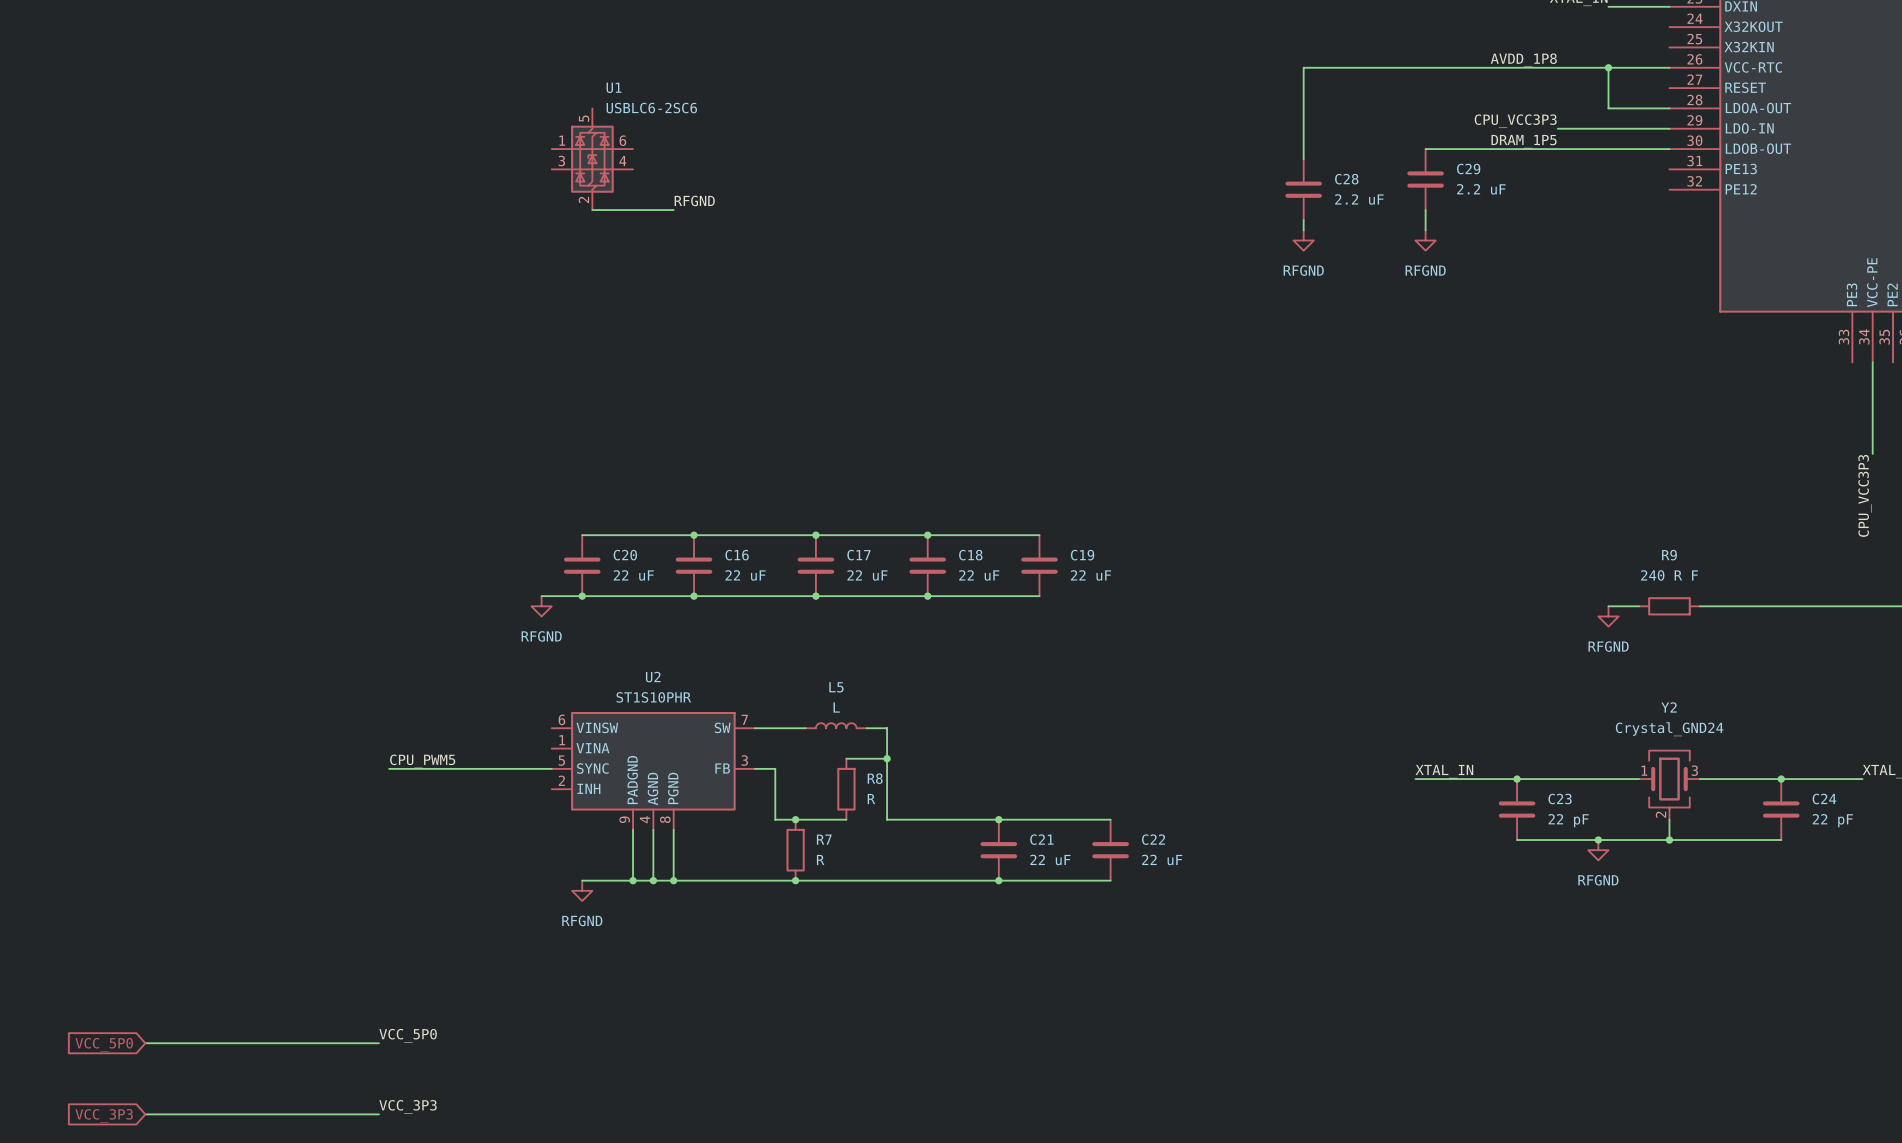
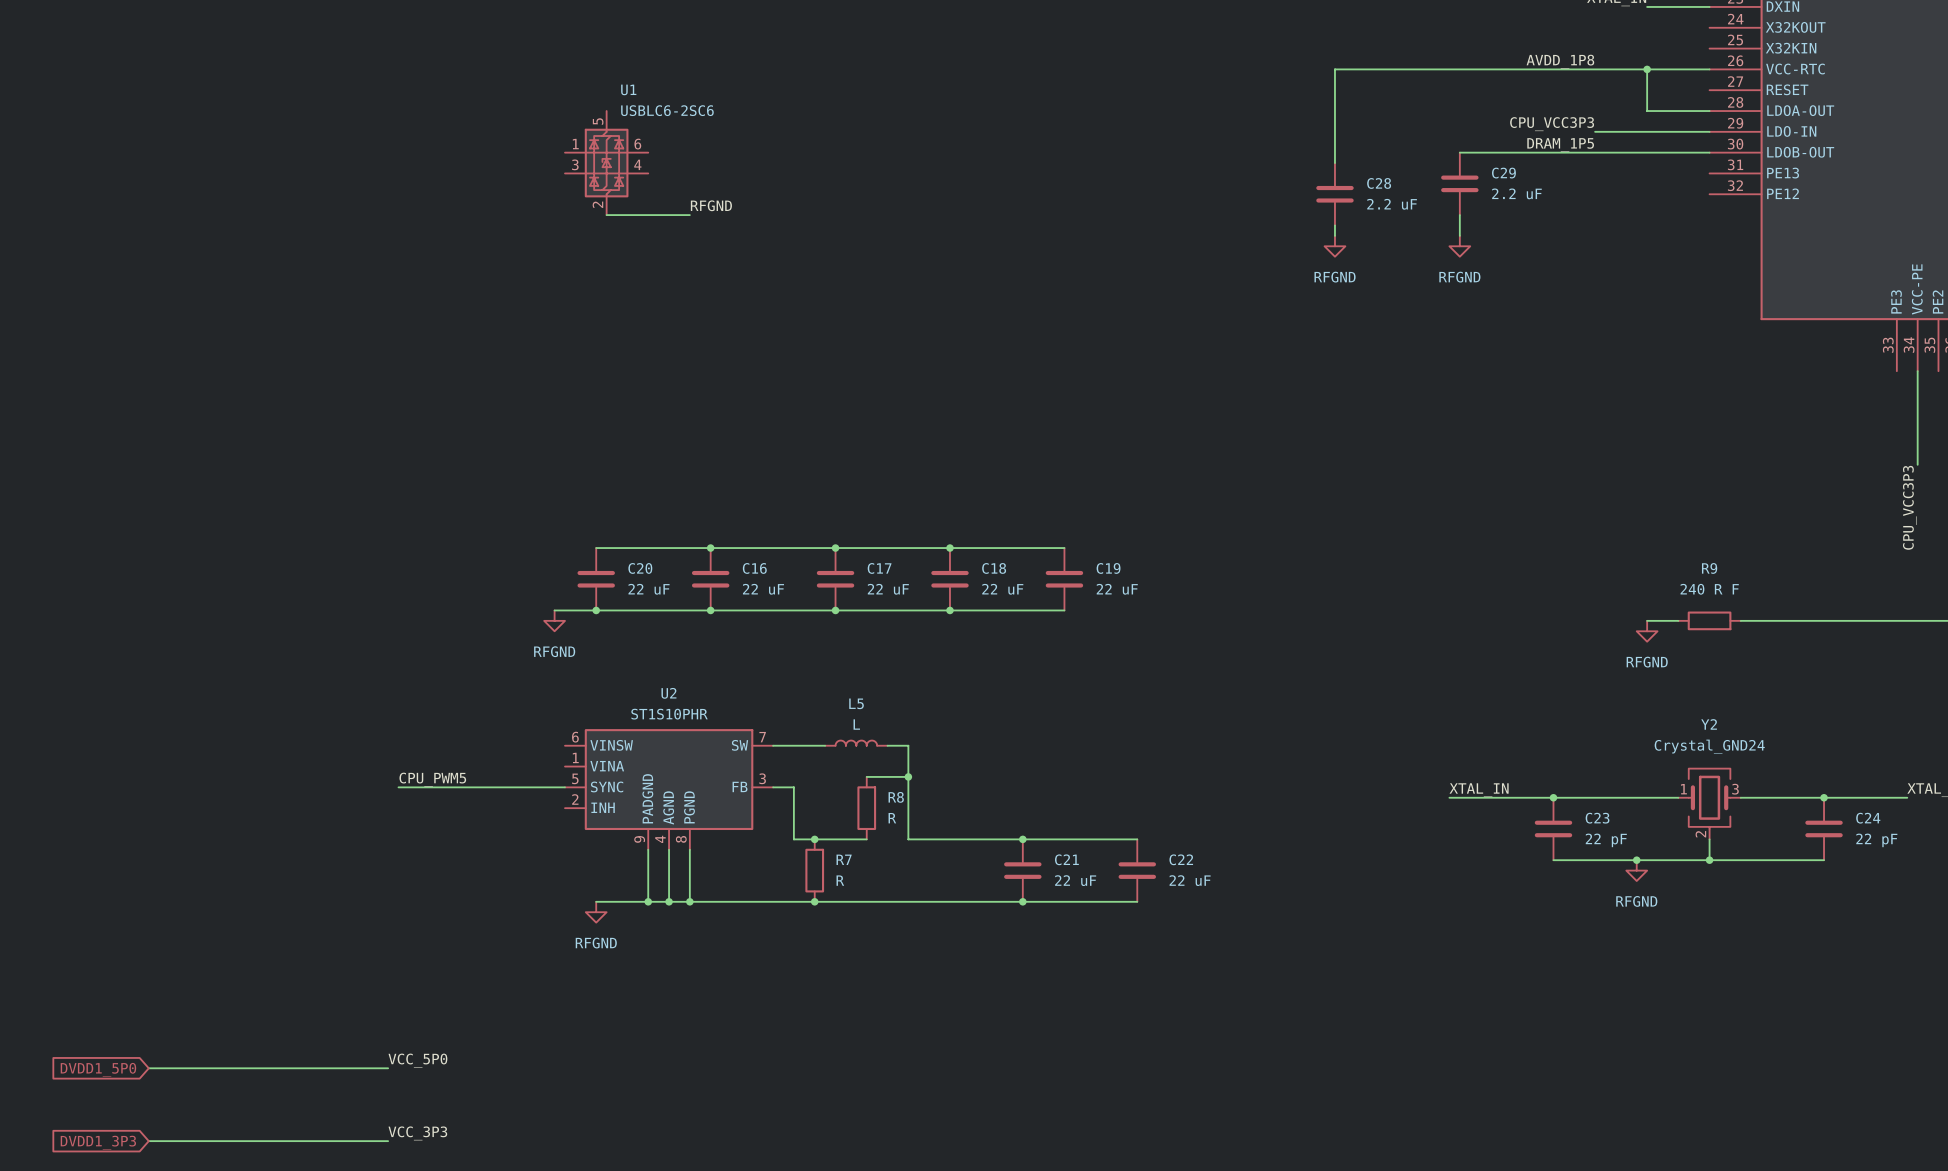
global label: VCC_5P0 (104, 1044) -> DVDD1_5P0 (98, 1069)
global label: VCC_3P3 (104, 1115) -> DVDD1_3P3 (98, 1142)

